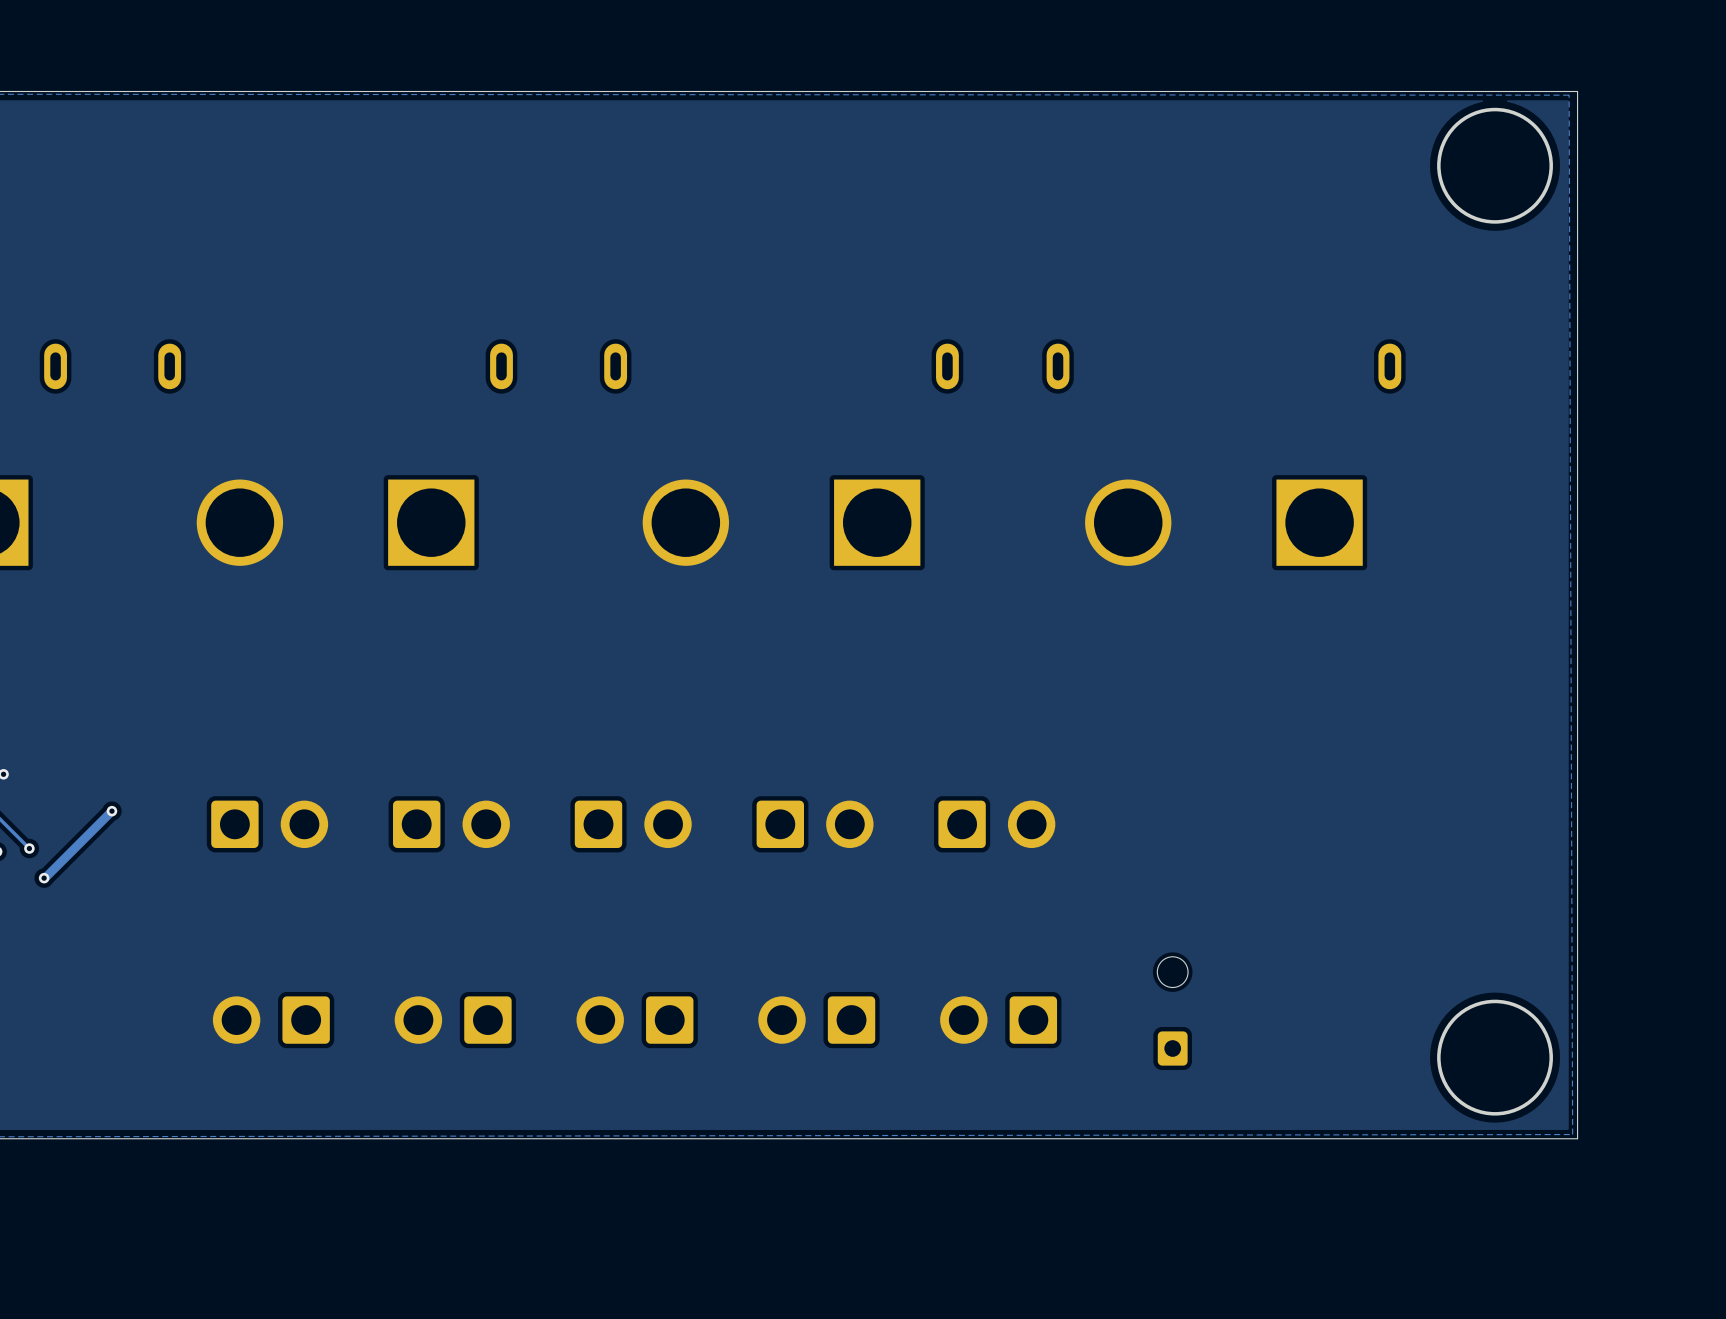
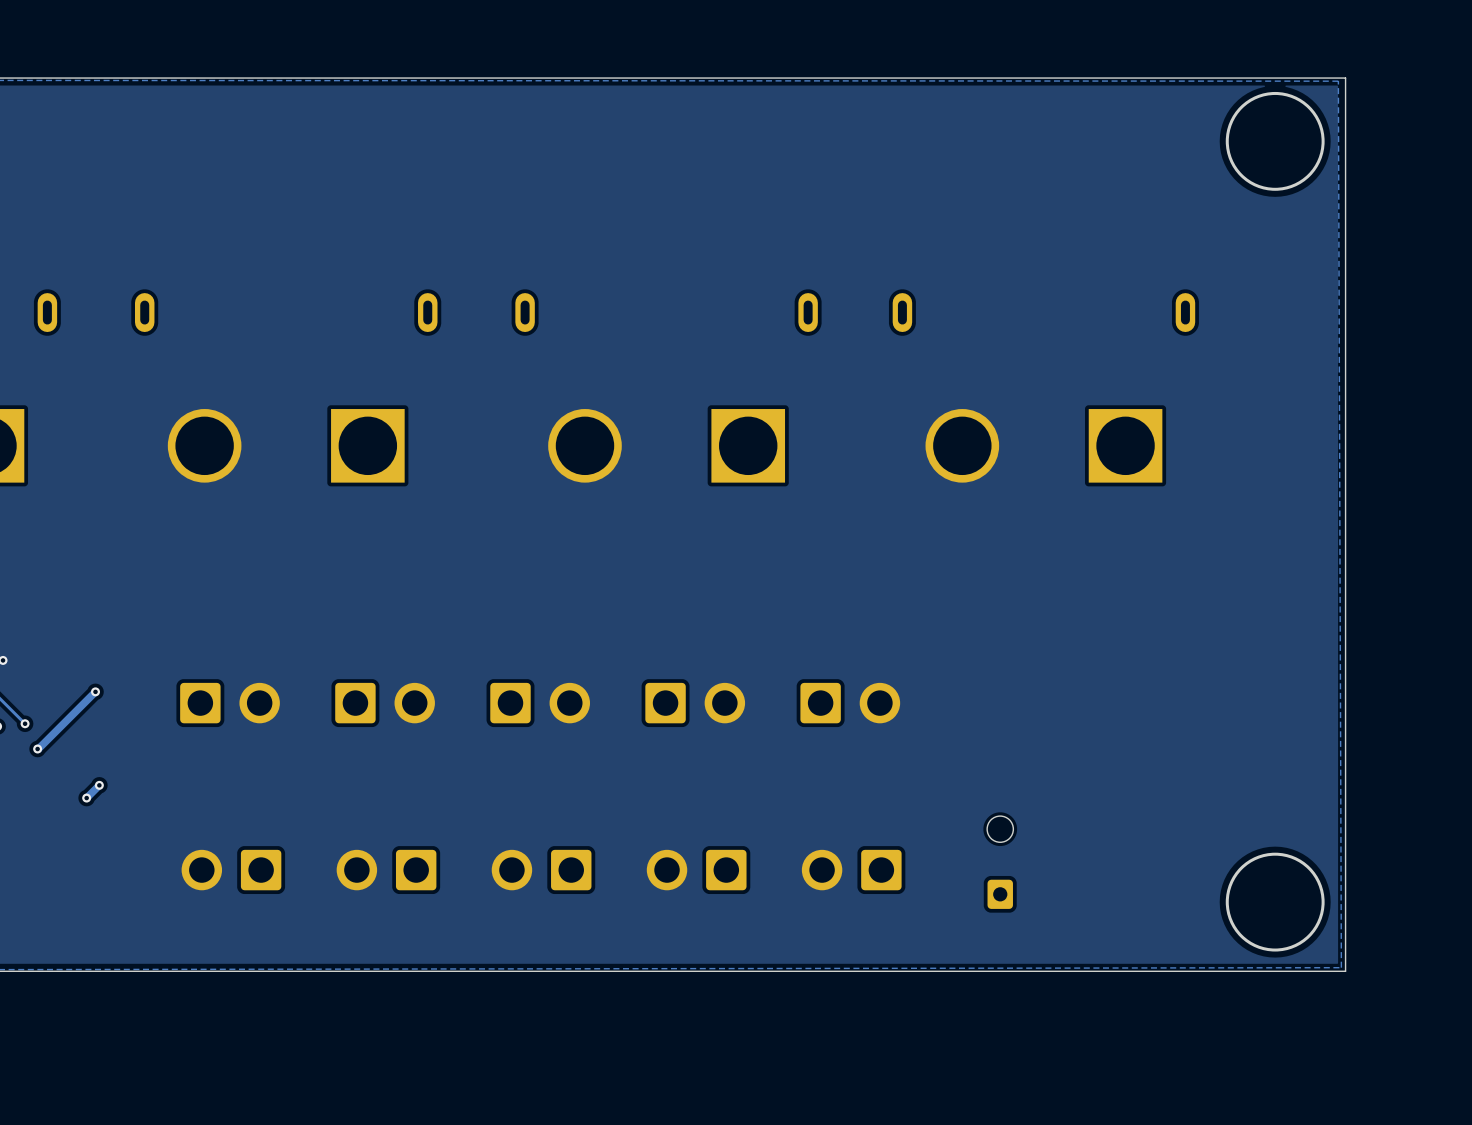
track: none -> (99, 785) (86, 798)
via: none -> (99, 785)
via: none -> (86, 798)

